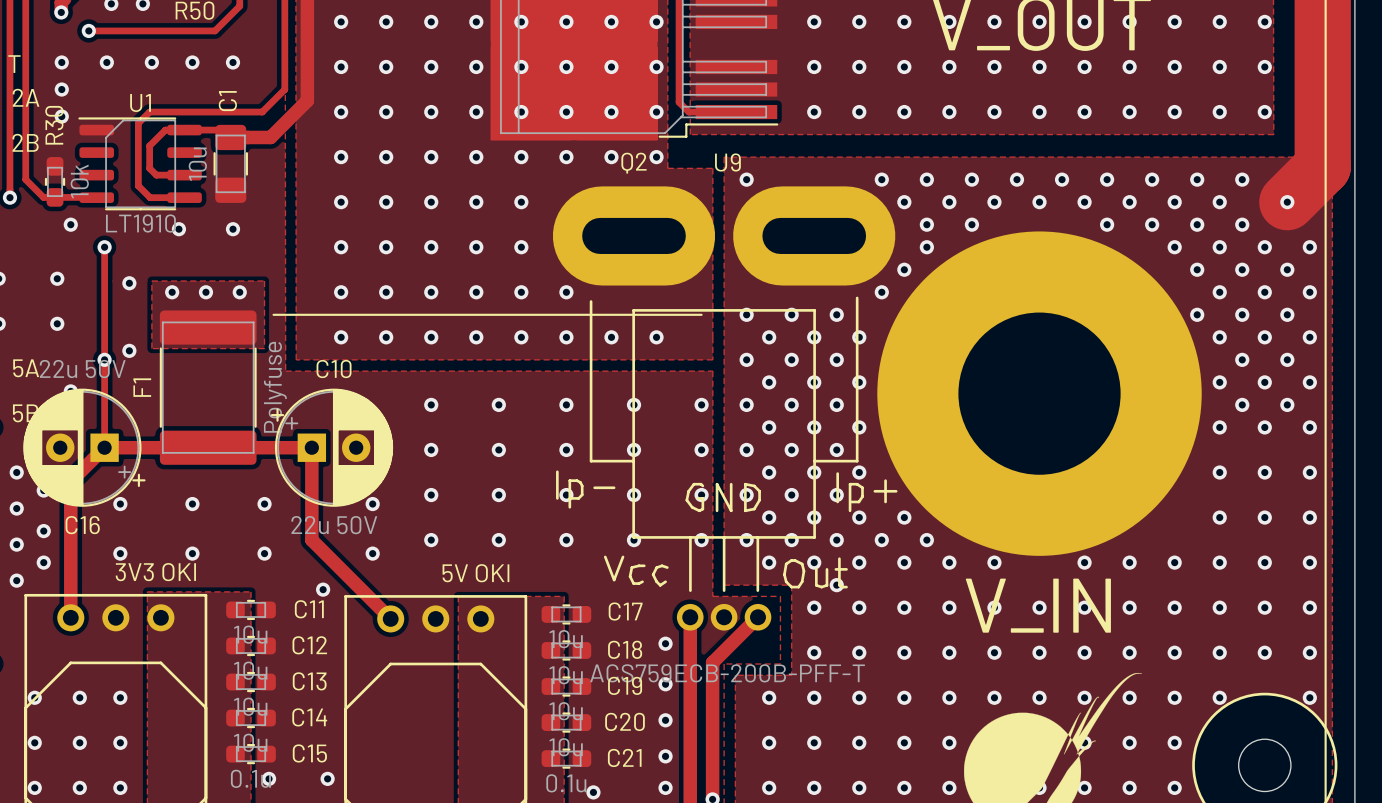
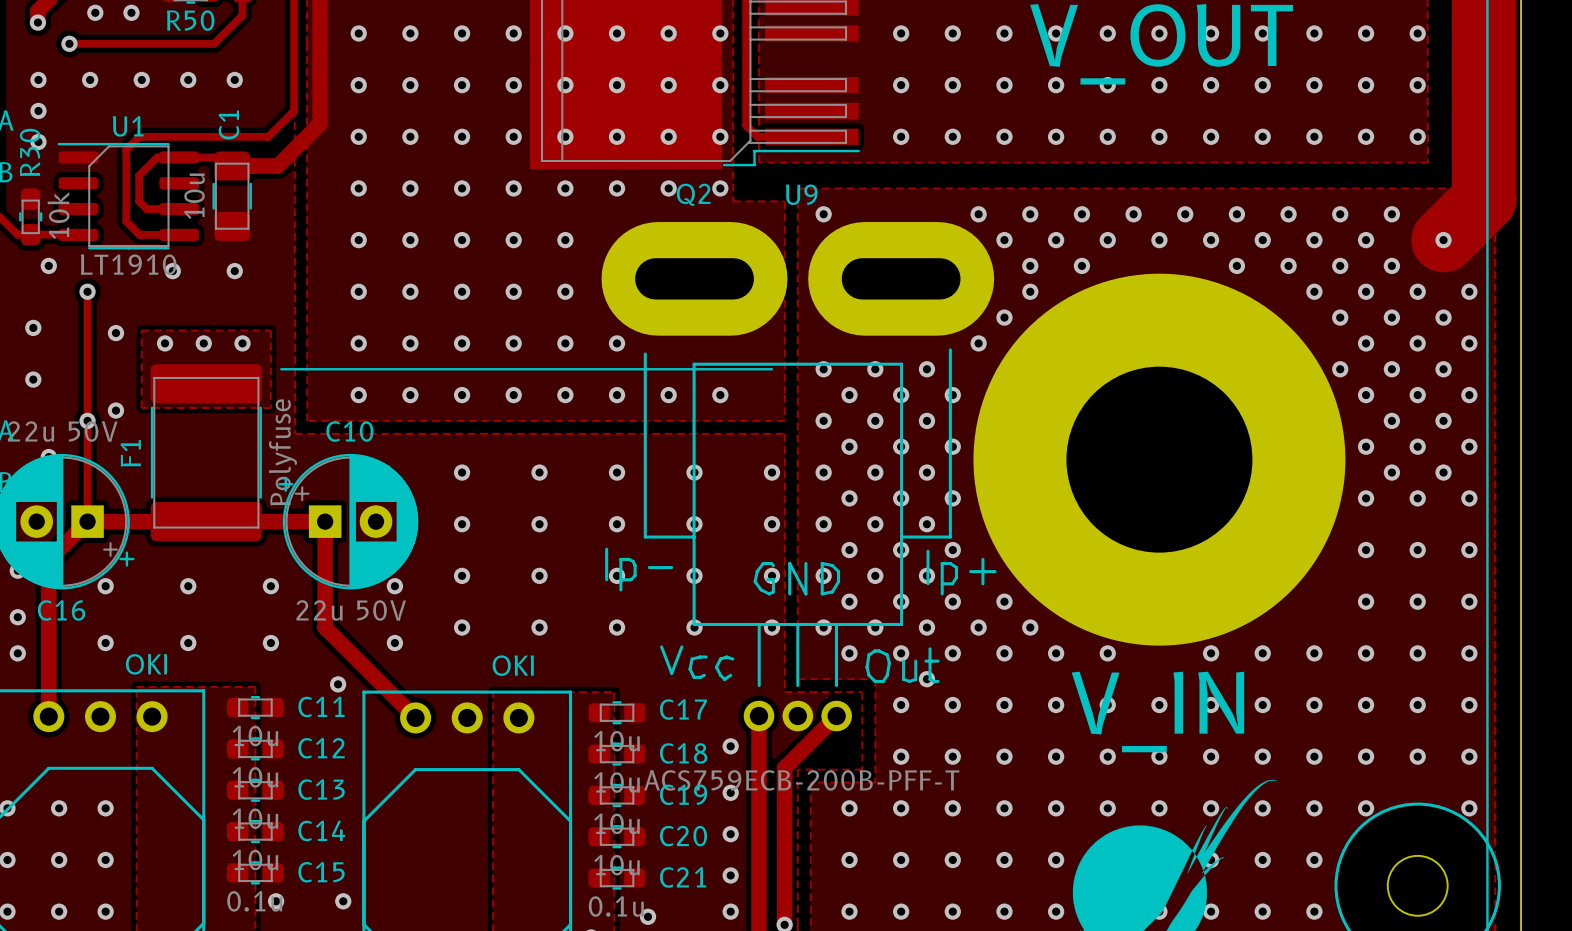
part value: 3V3 OKI (155, 572) -> OKI (146, 664)
part value: 5V OKI (475, 573) -> OKI (513, 665)

